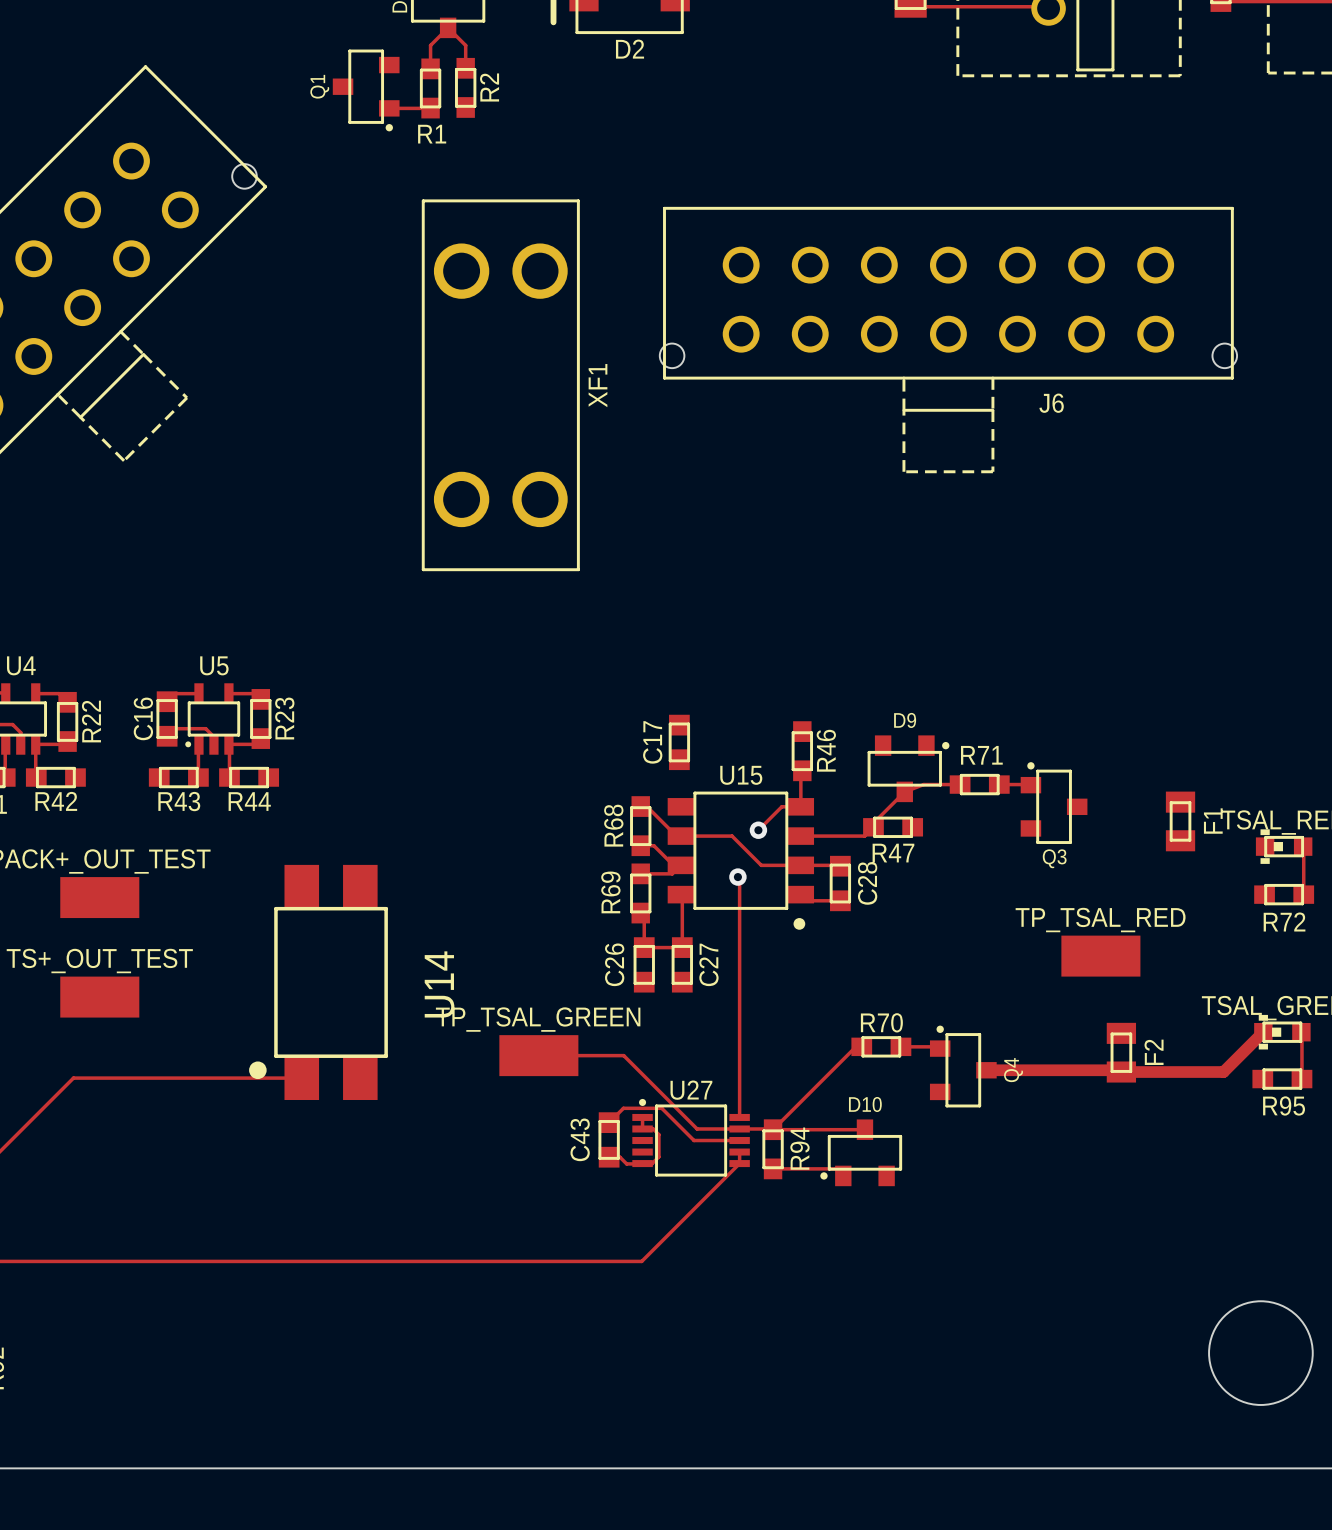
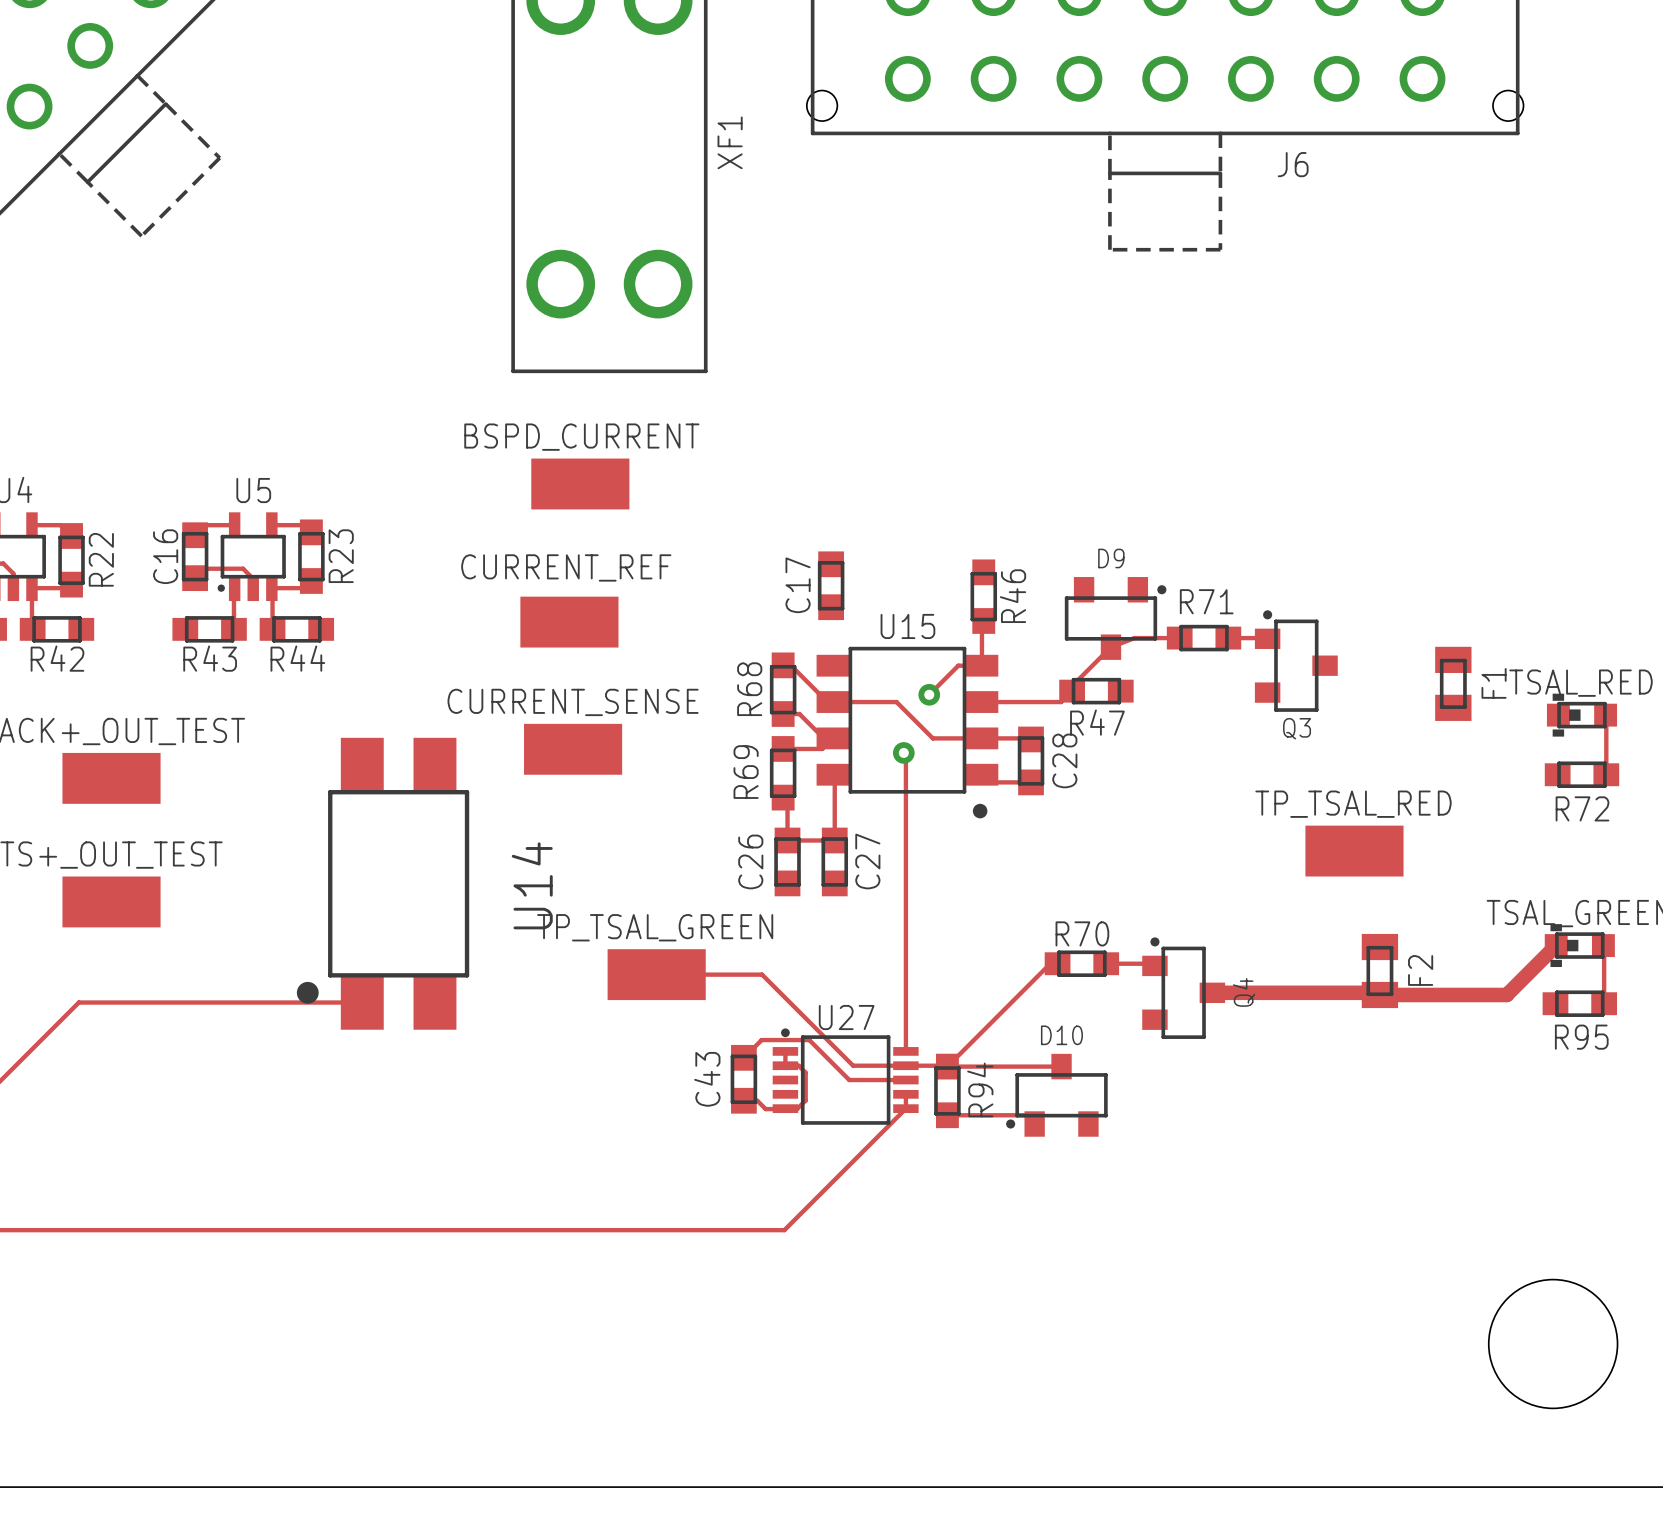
BSPD_CURRENT: none -> (580, 483)
CURRENT_REF: none -> (569, 622)
CURRENT_SENSE: none -> (573, 749)

